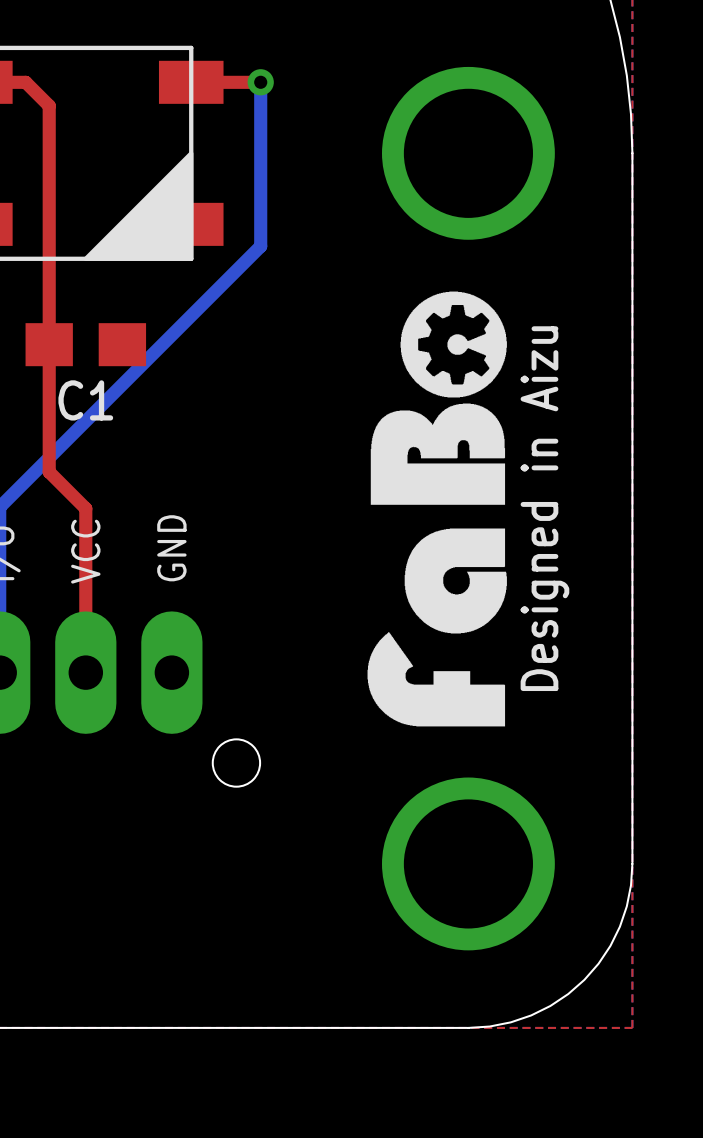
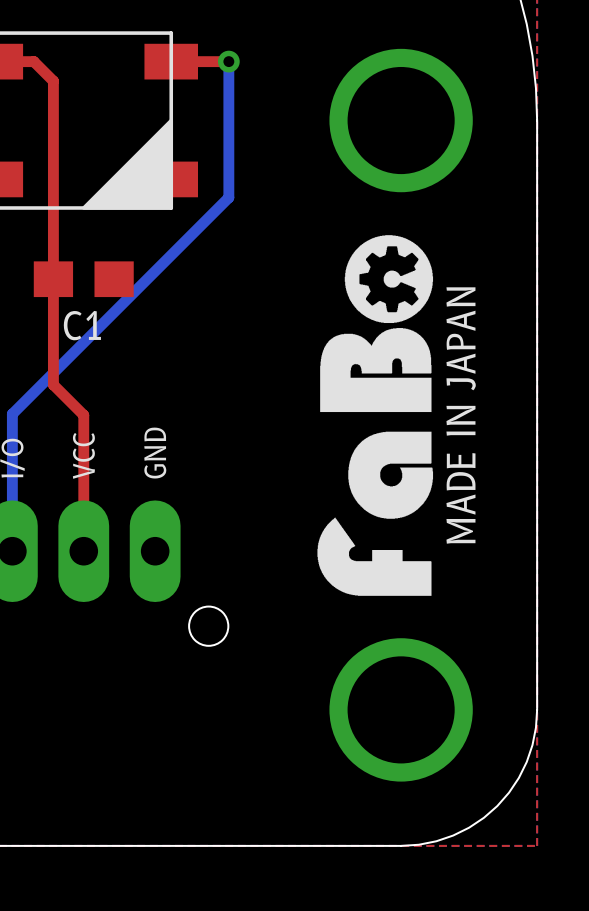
text: Designed in Aizu (544, 508) -> MADE IN JAPAN (461, 415)

